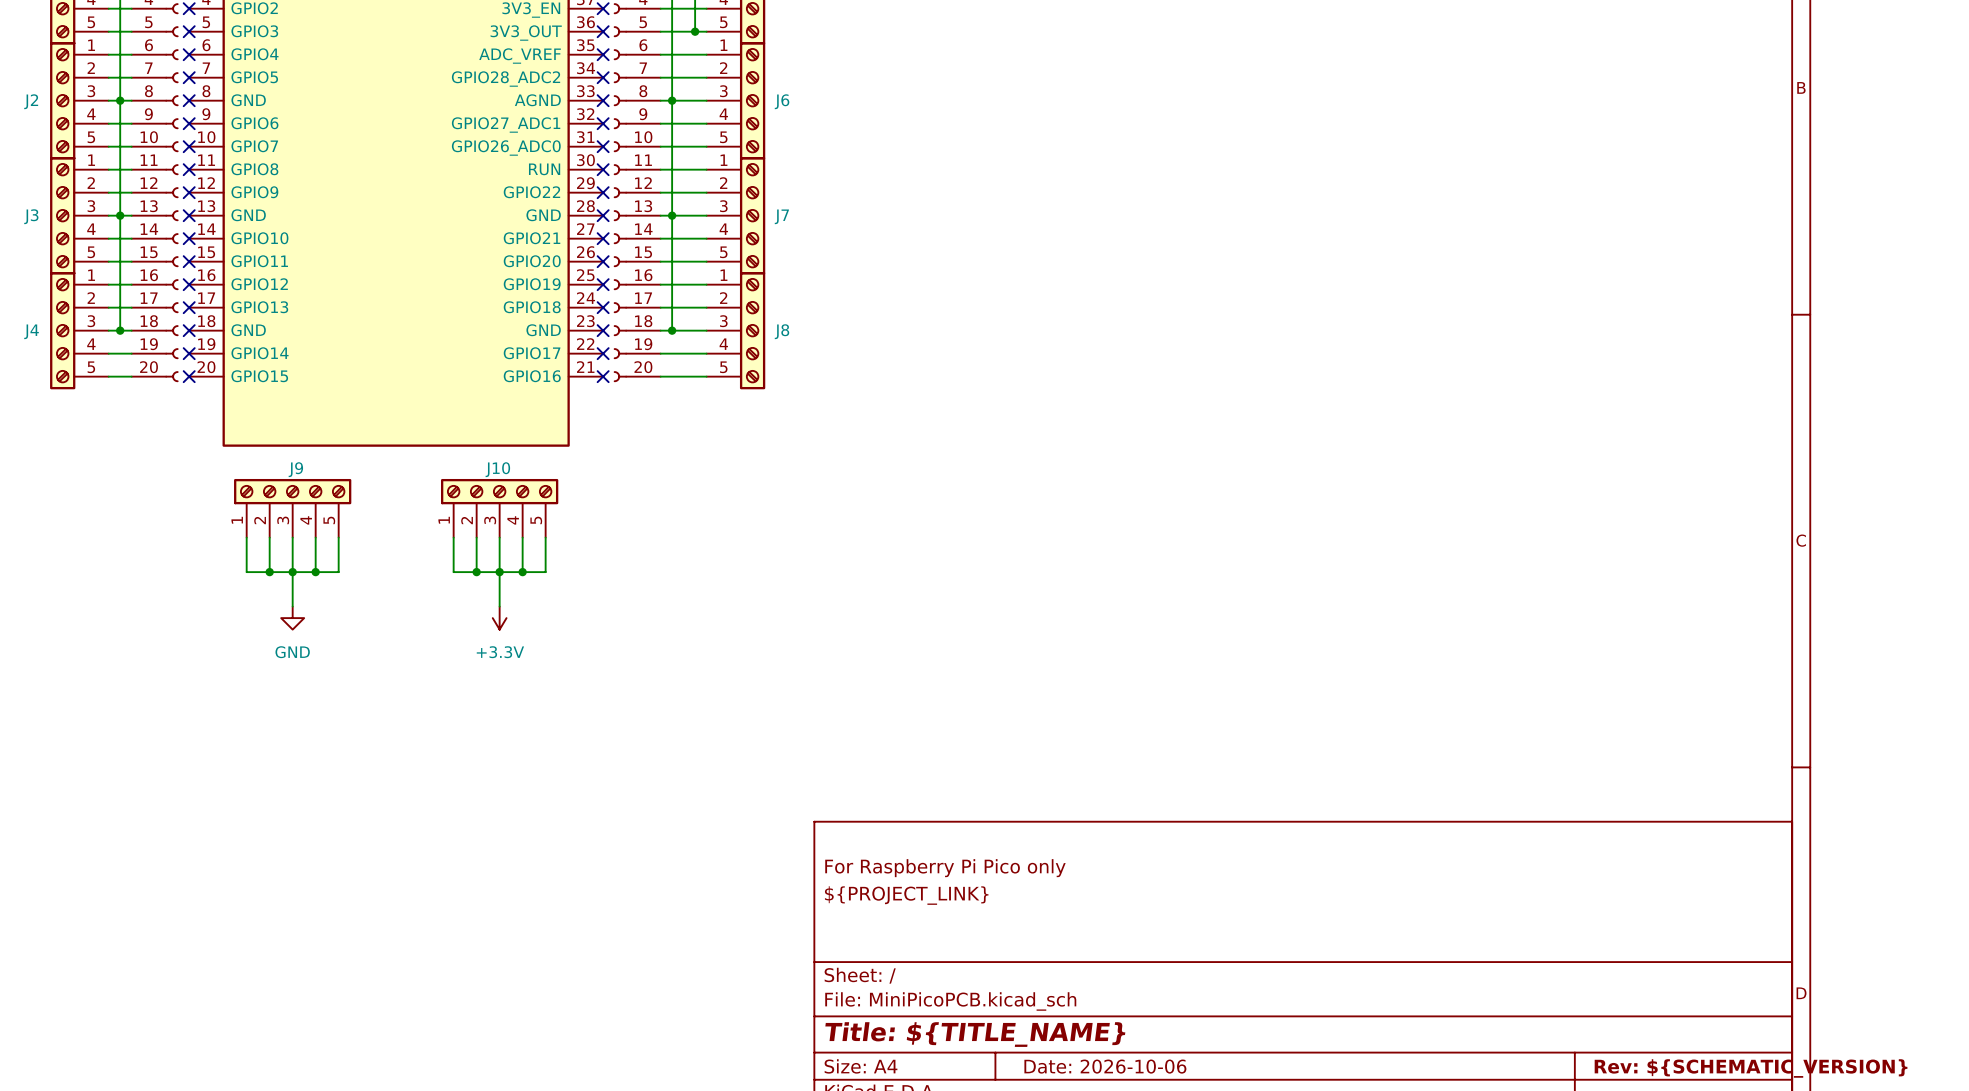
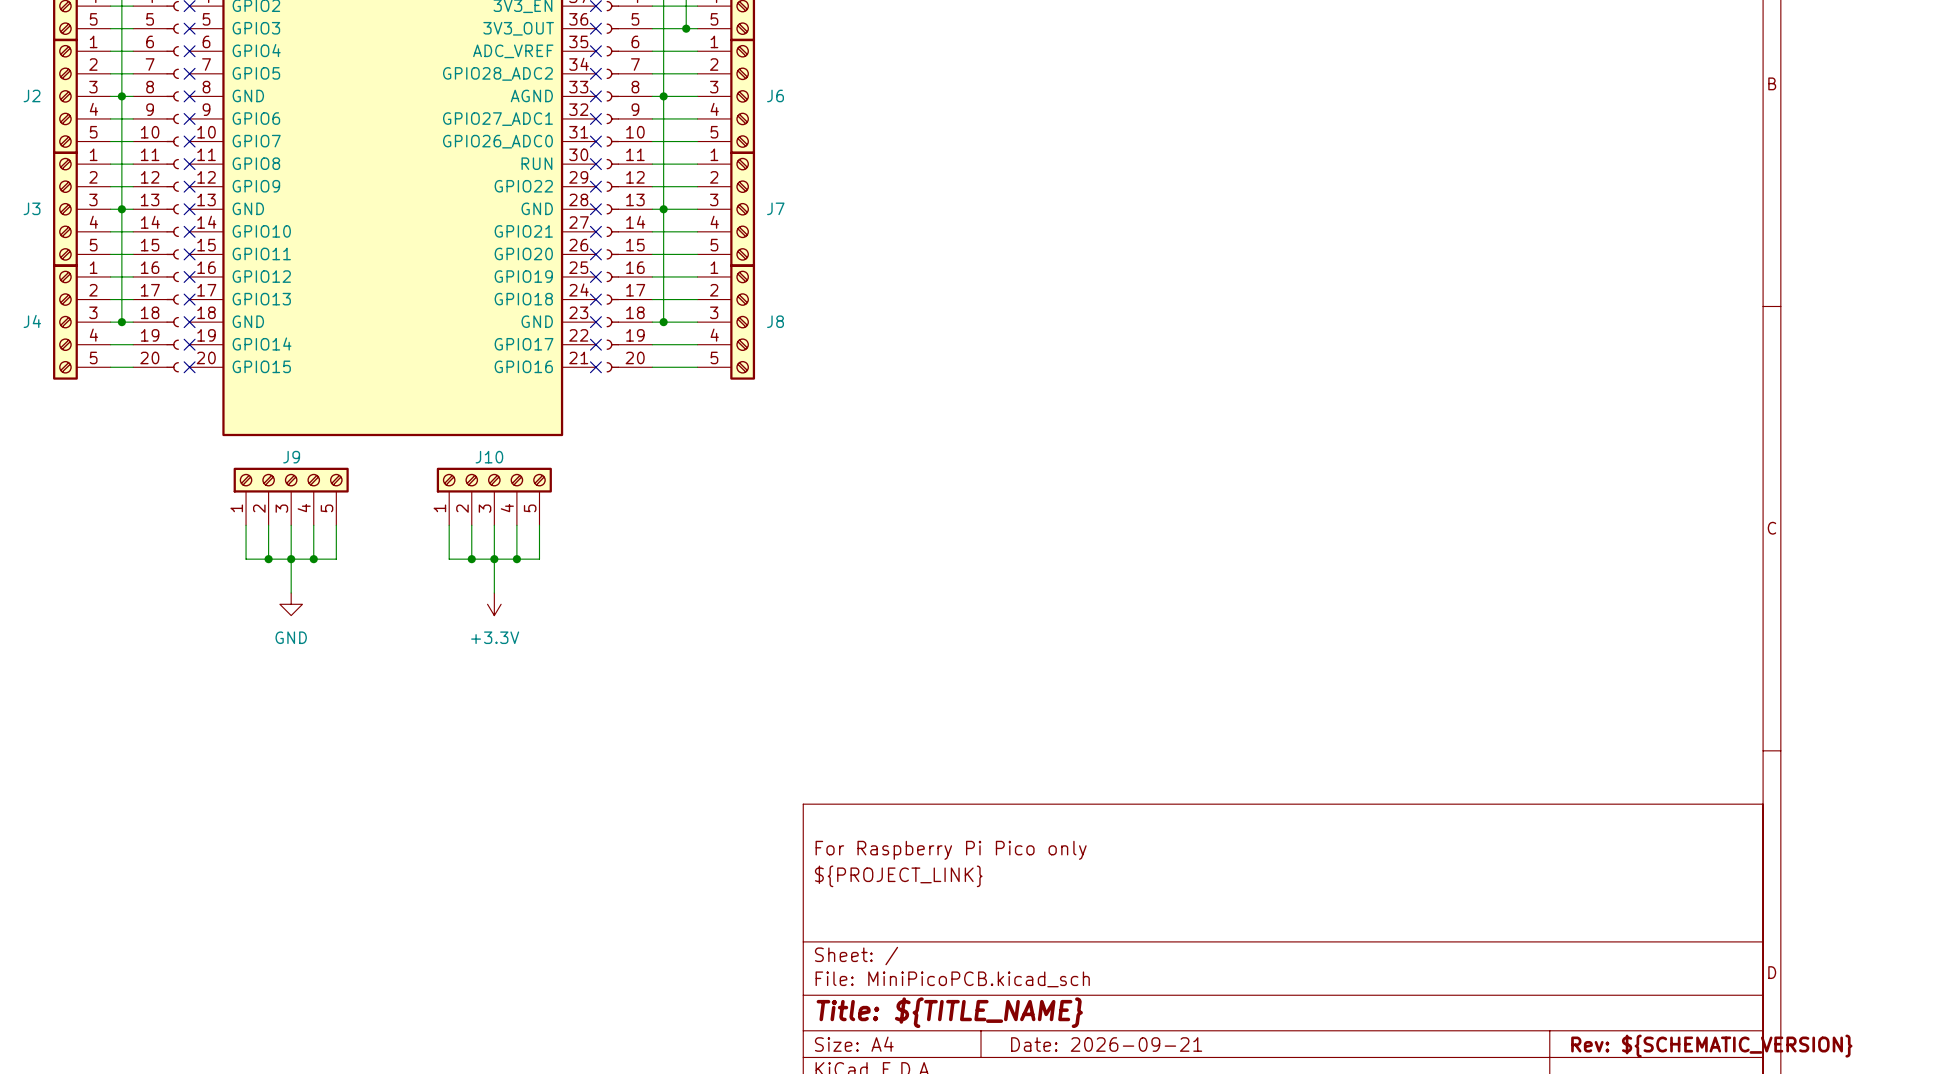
title block: Date: 2026-10-06 (1105, 1066) -> Date: 2026-09-21 (1106, 1044)

